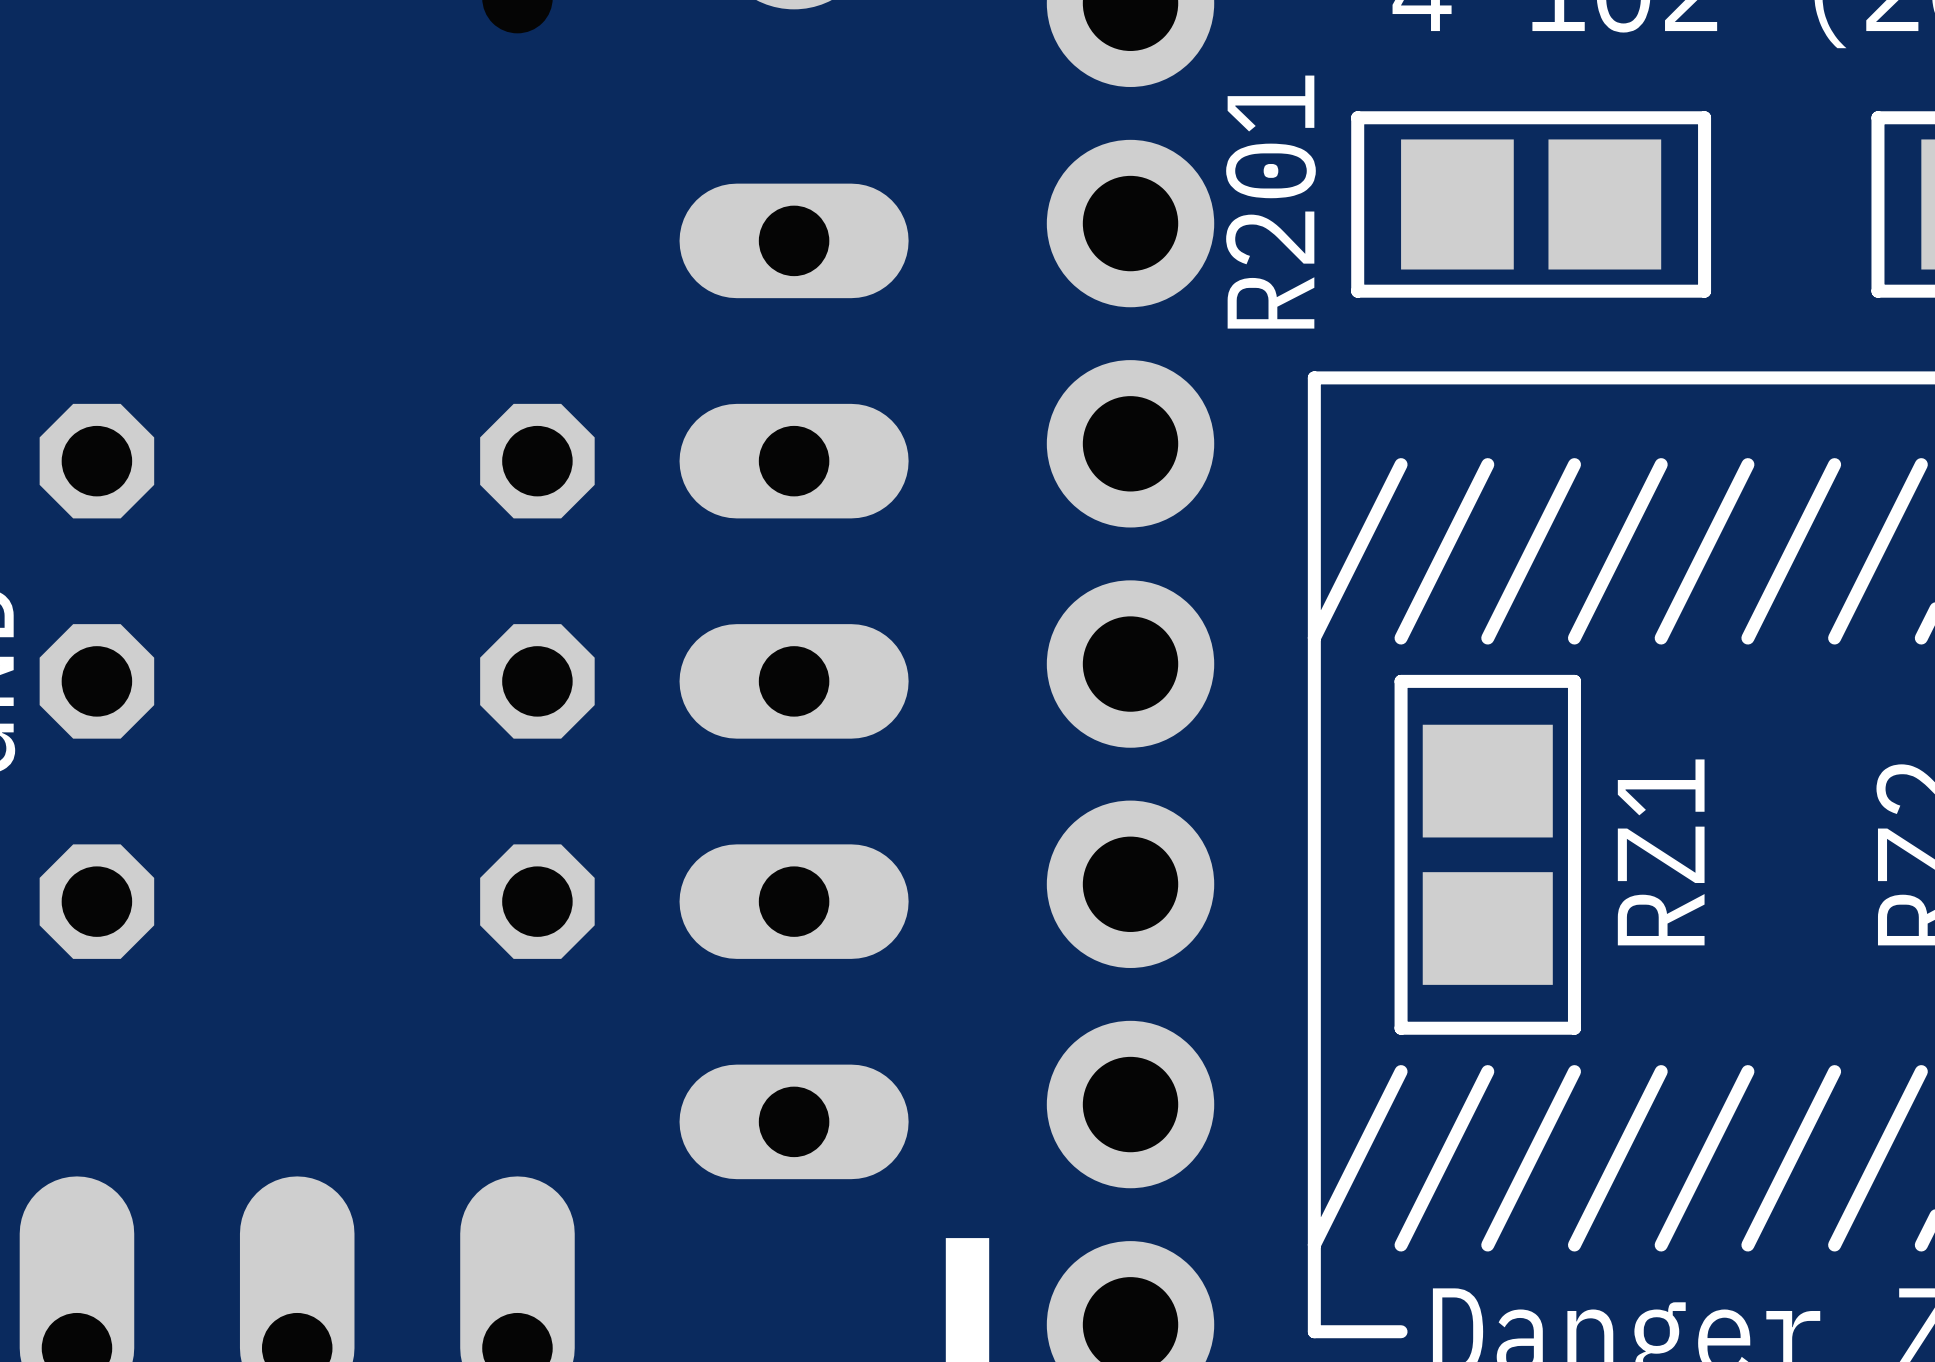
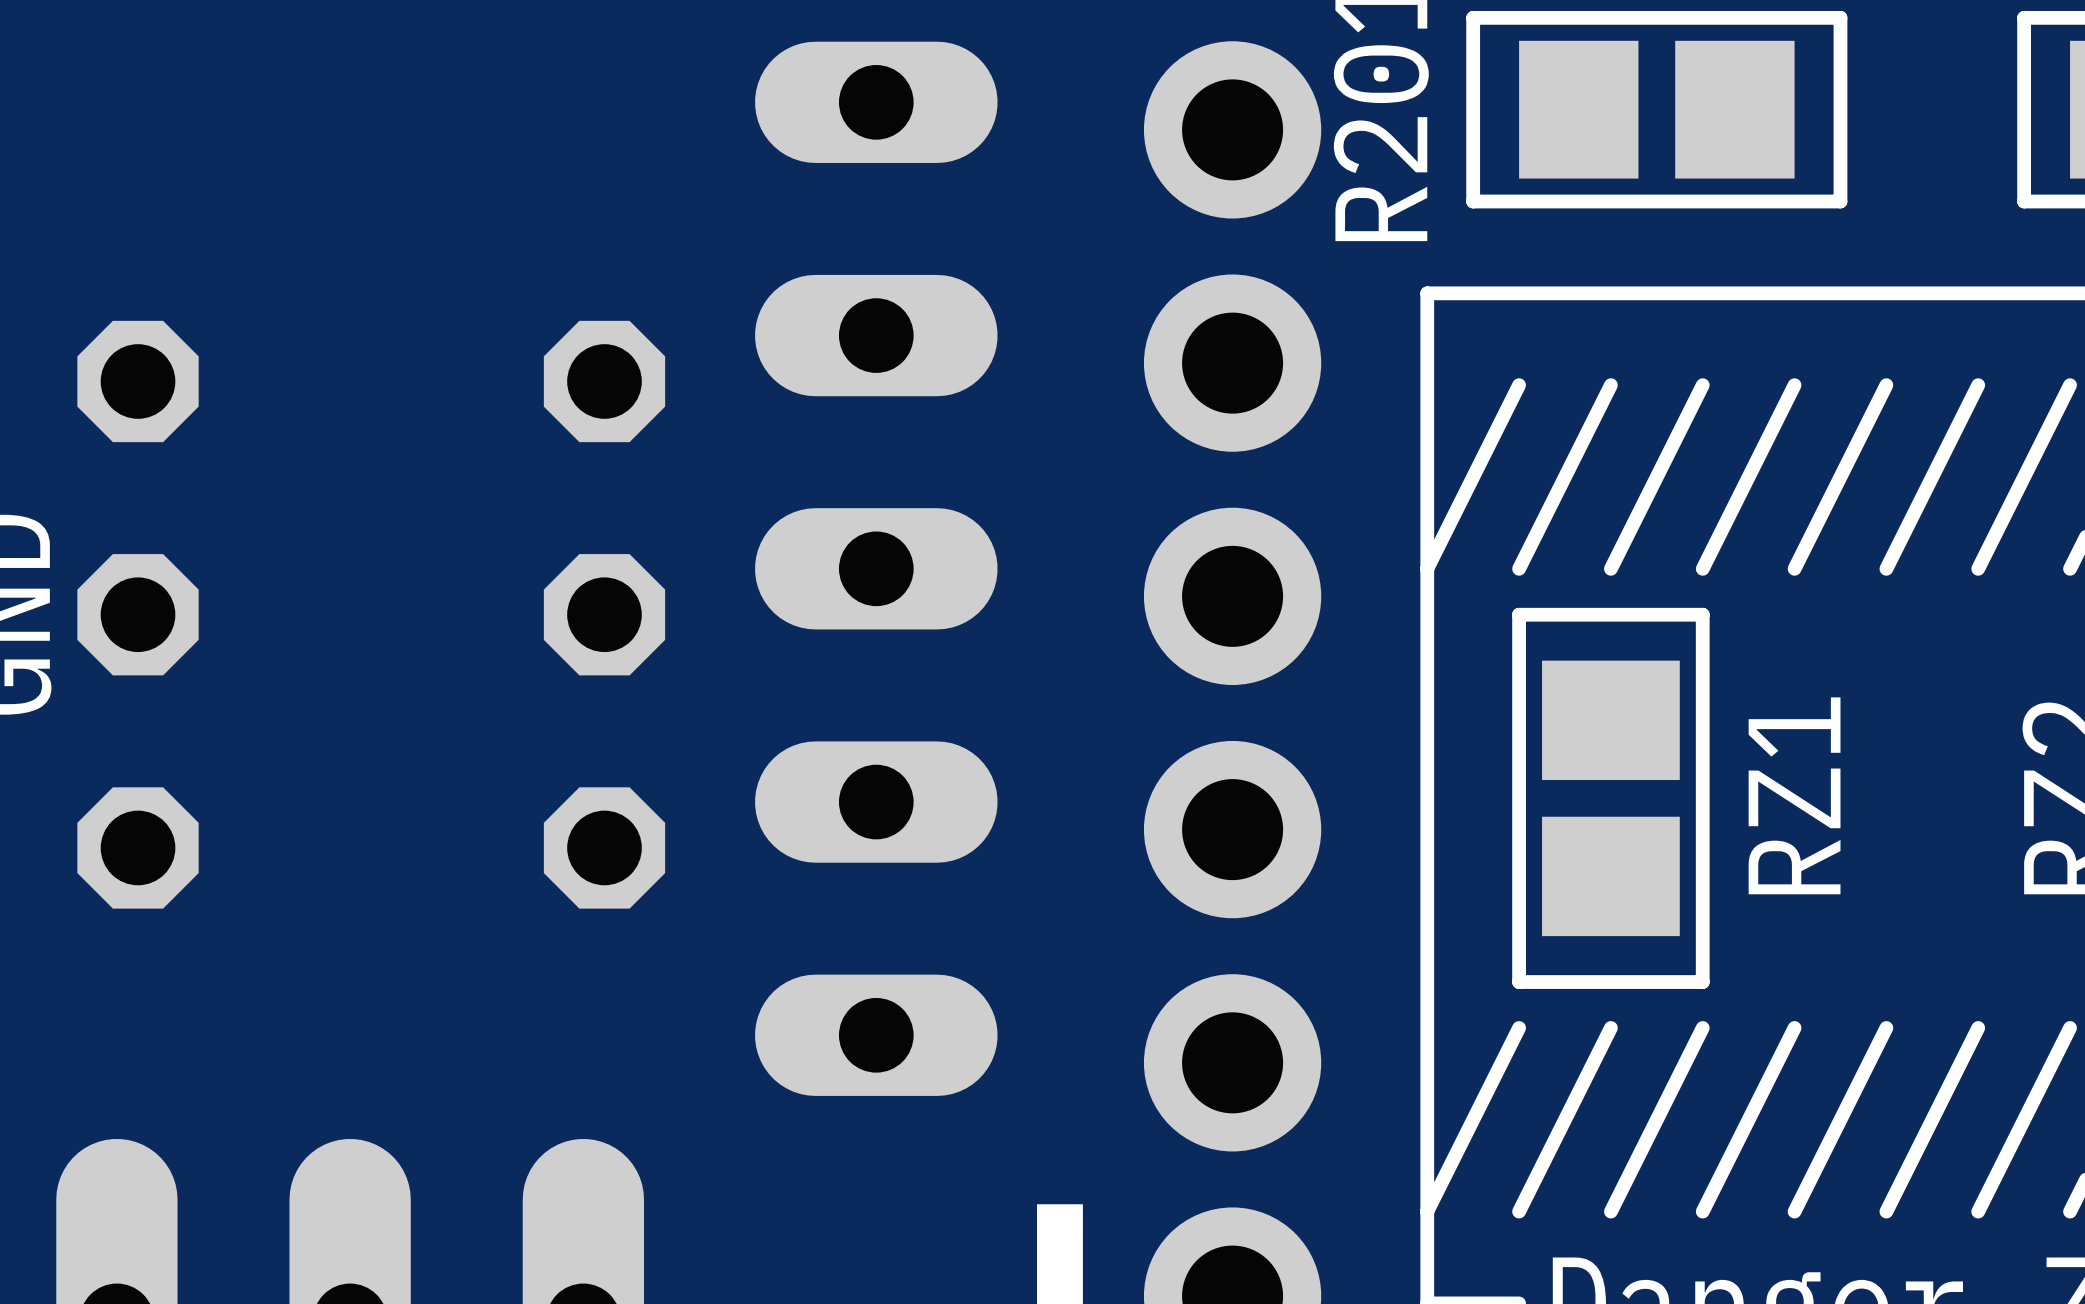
part position: (794, 681) -> (876, 568)

